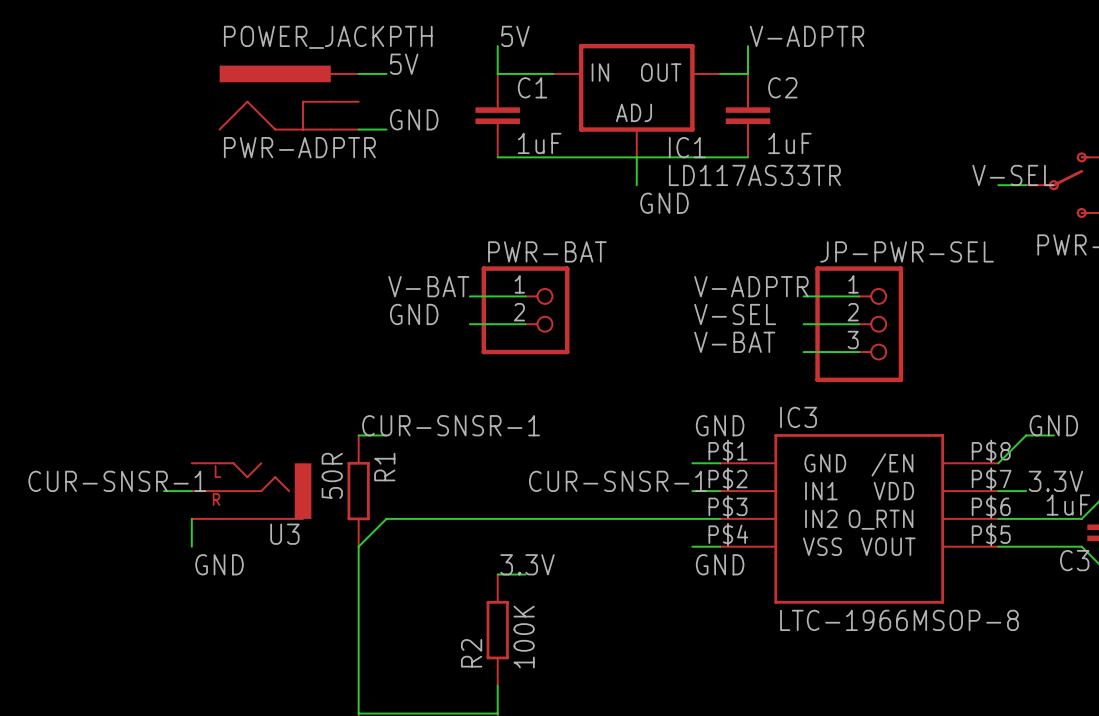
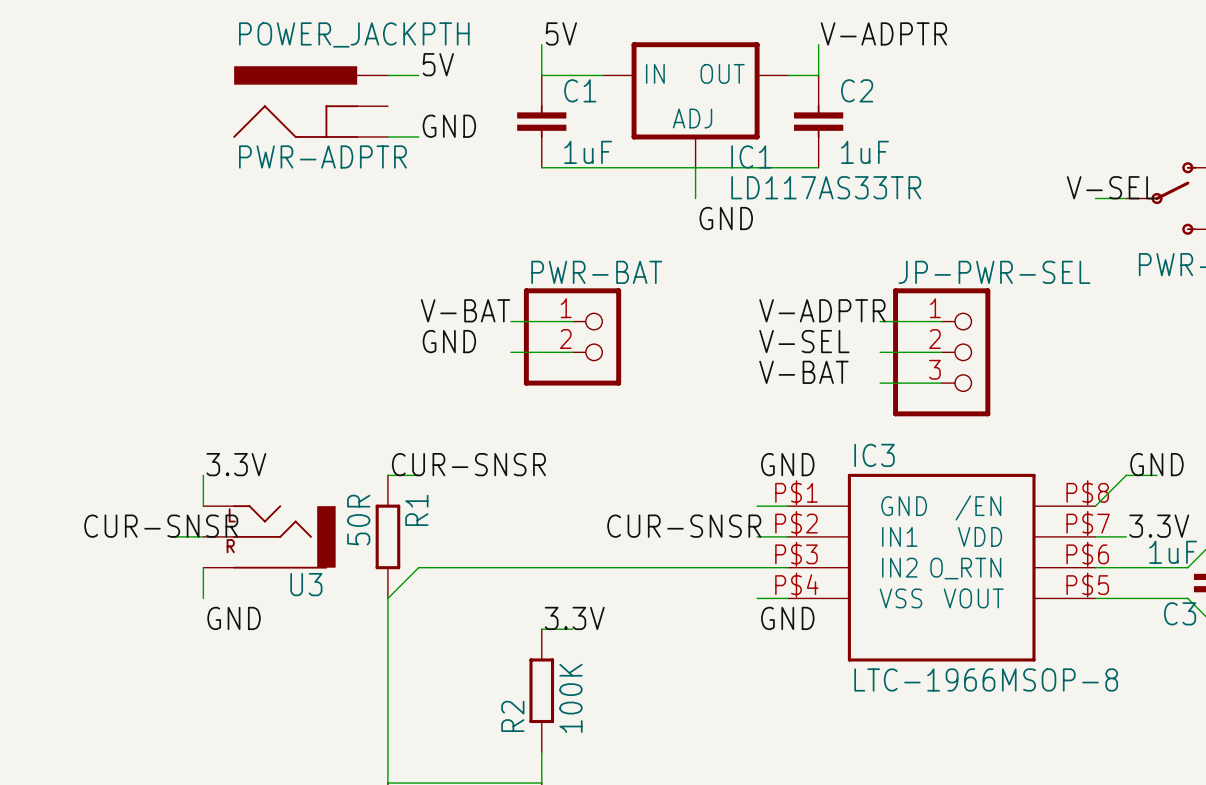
label: none -> 3.3V (236, 464)
label: CUR-SNSR-1 (451, 425) -> CUR-SNSR (468, 464)
wire: none -> (203, 475) (203, 506)
label: CUR-SNSR-1 (117, 481) -> CUR-SNSR (161, 526)
label: CUR-SNSR-1 (617, 481) -> CUR-SNSR (684, 526)

